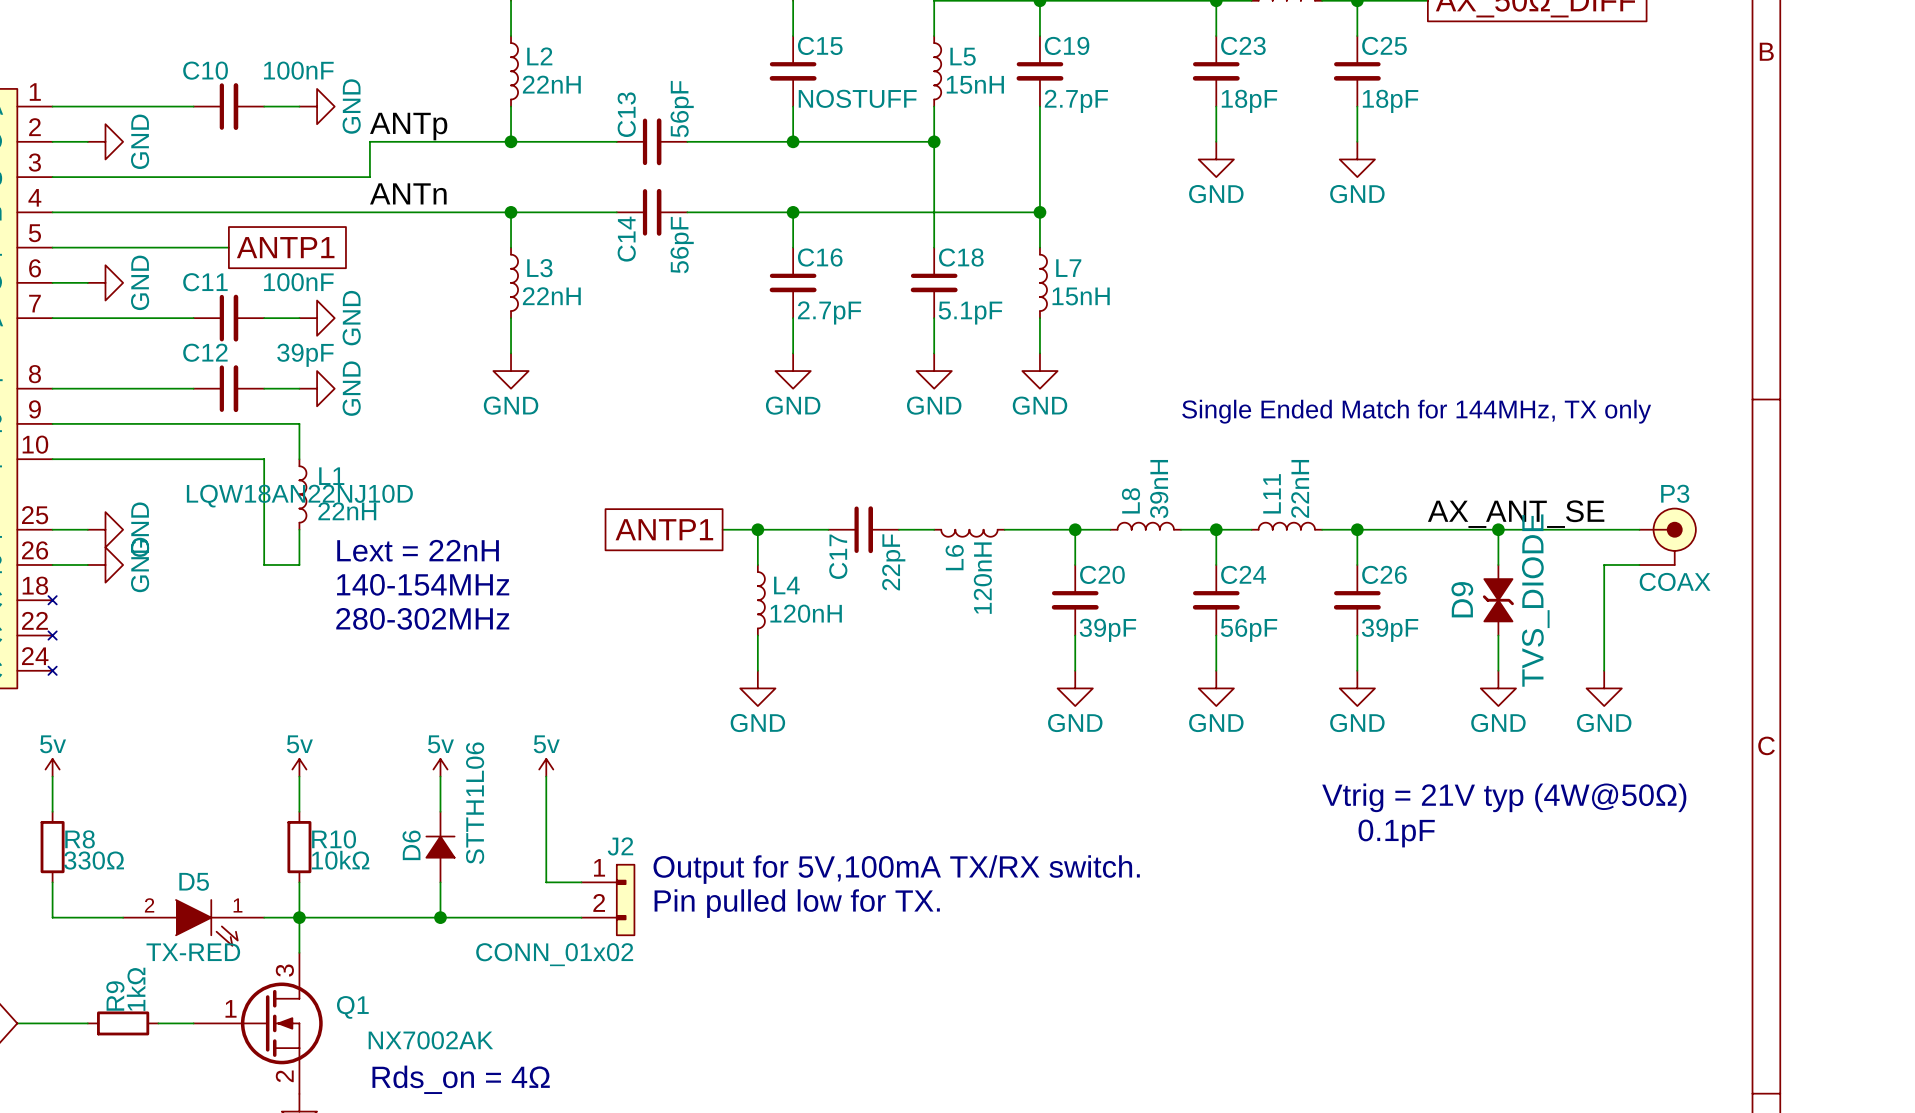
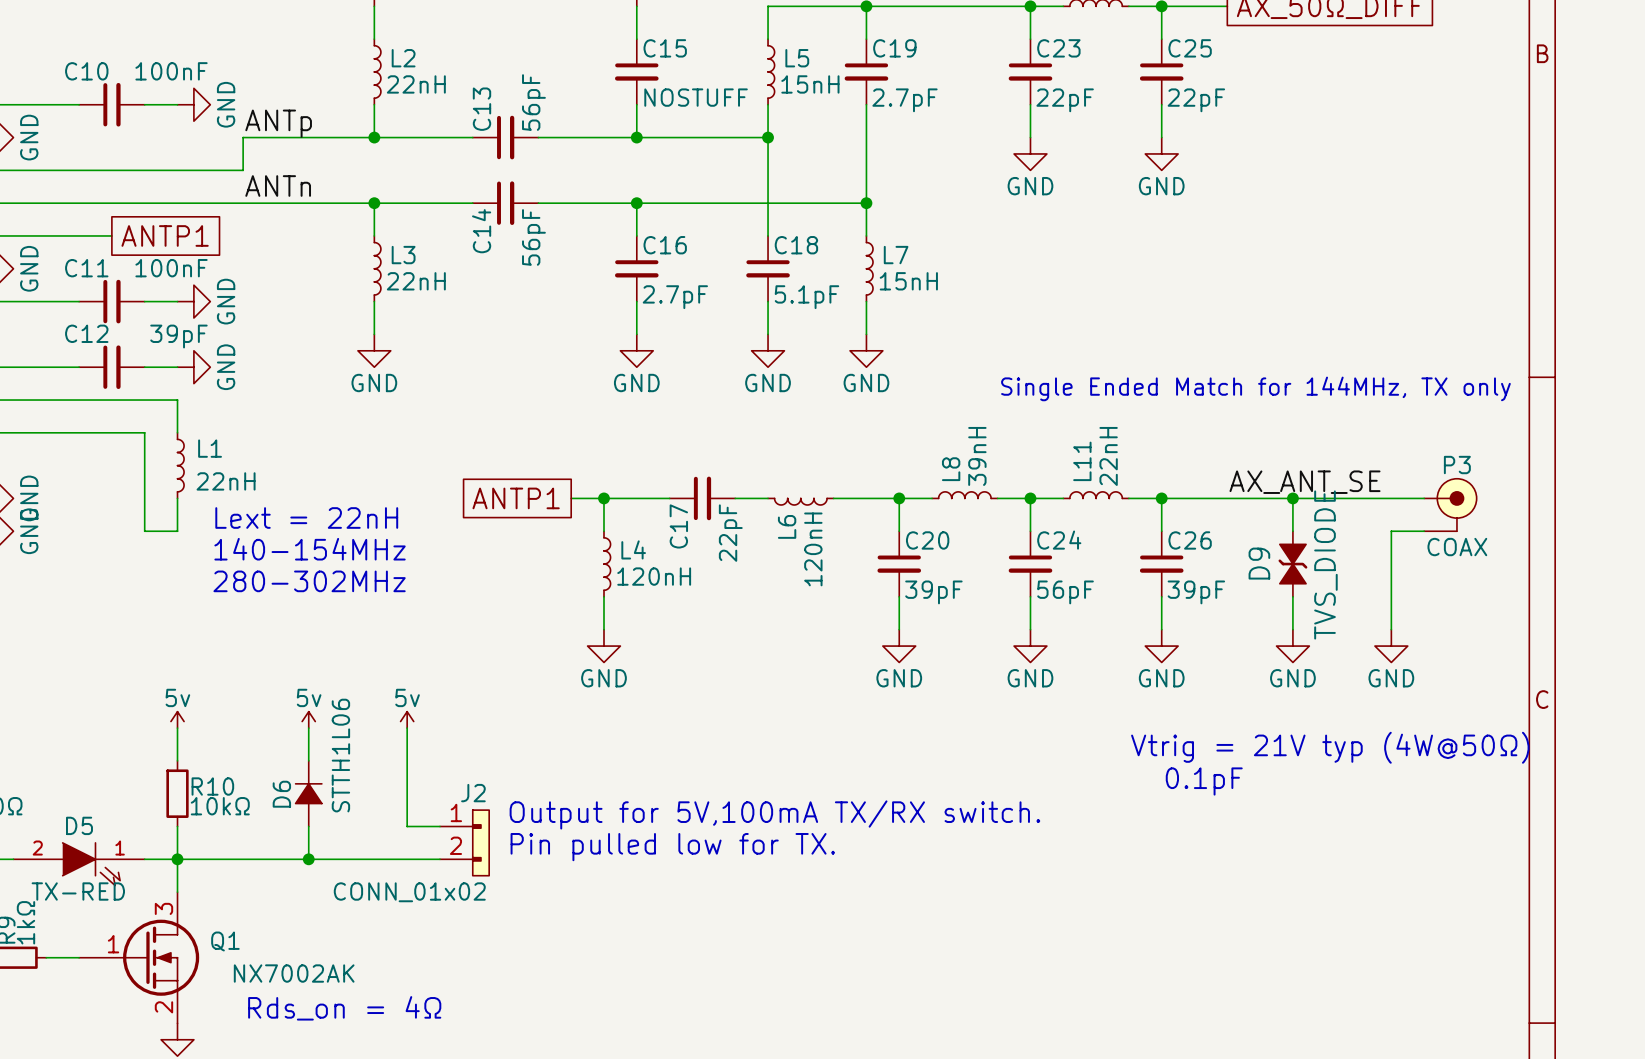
C23 value: 18pF (1249, 101) -> 22pF (1065, 100)
C25 value: 18pF (1390, 101) -> 22pF (1196, 100)
L1 text: LQW18AN22NJ10D (299, 496) -> none

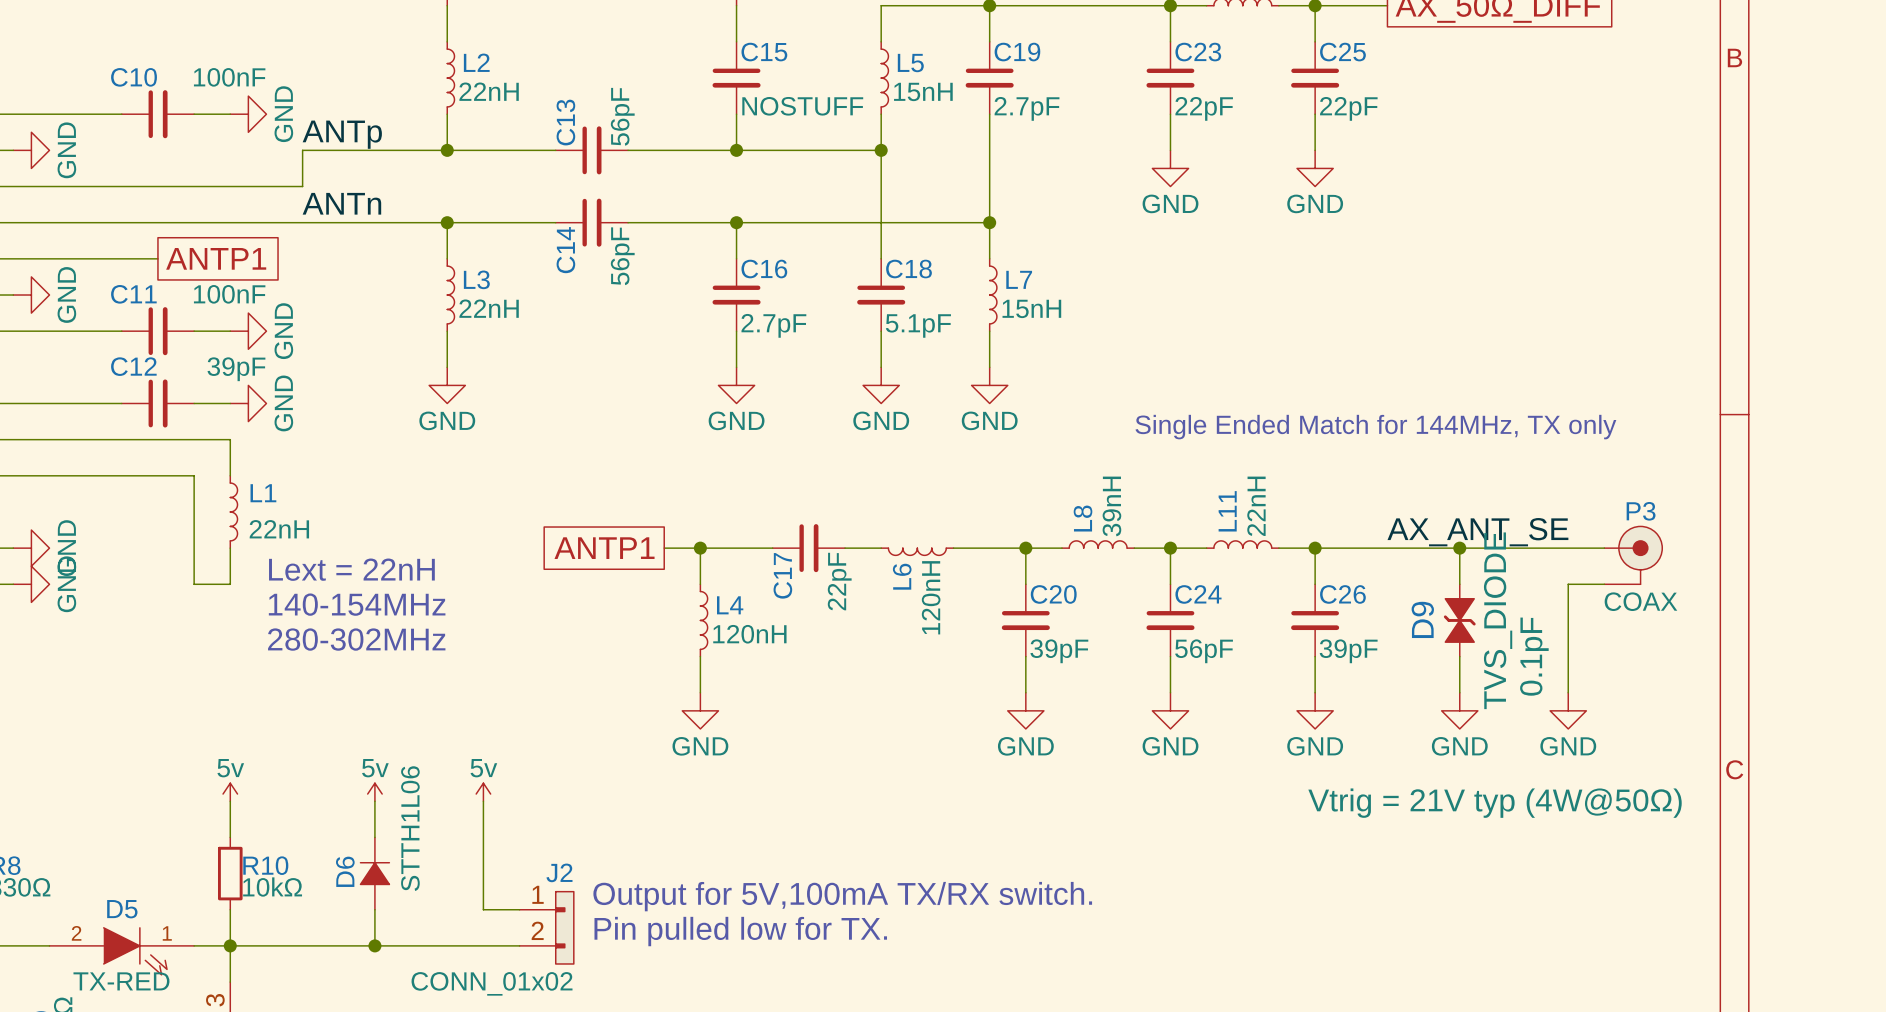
D9 text: none -> 0.1pF (1534, 656)
D9 text: none -> Vtrig = 21V typ (4W@50Ω) (1495, 803)
text: Vtrig = 21V typ (4W@50Ω) (1330, 747) -> none
text: 0.1pF (1204, 781) -> none

